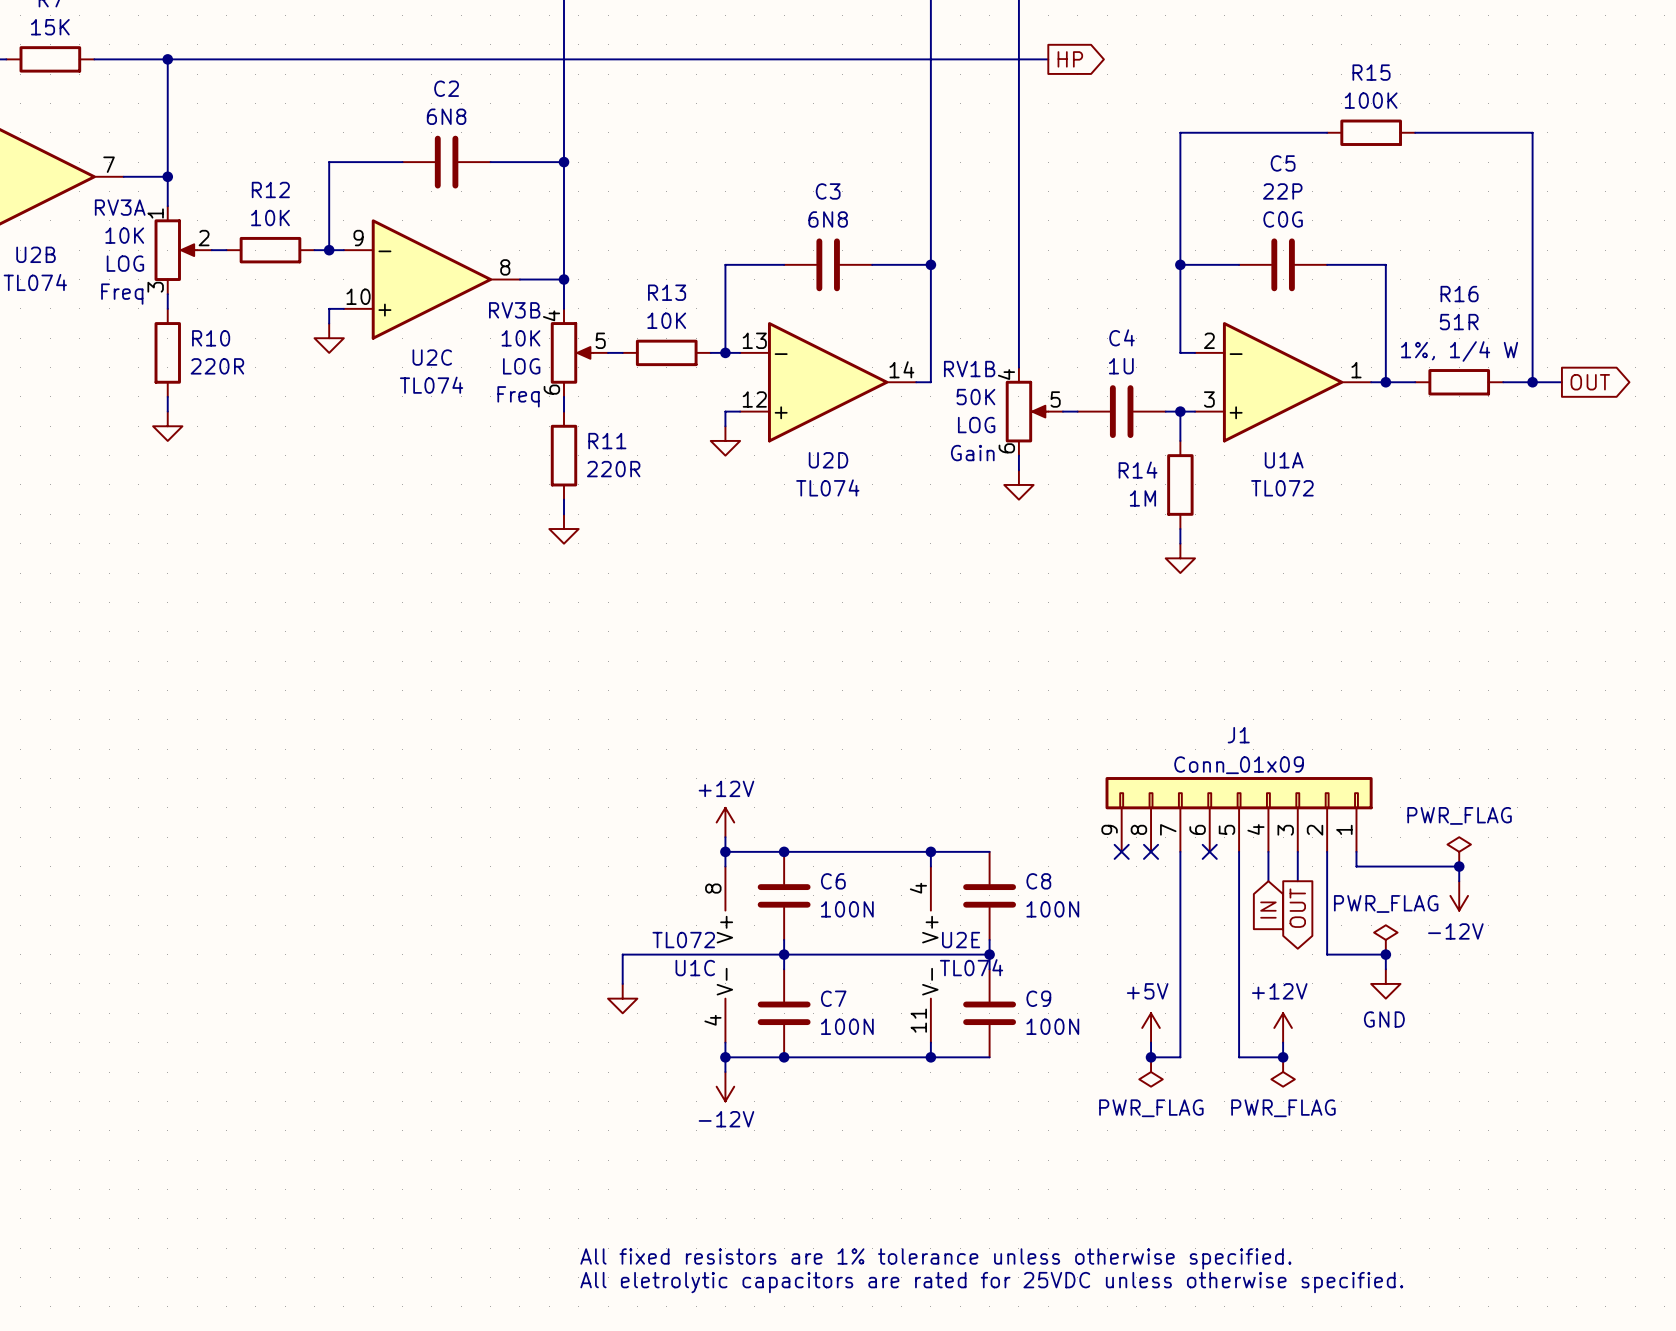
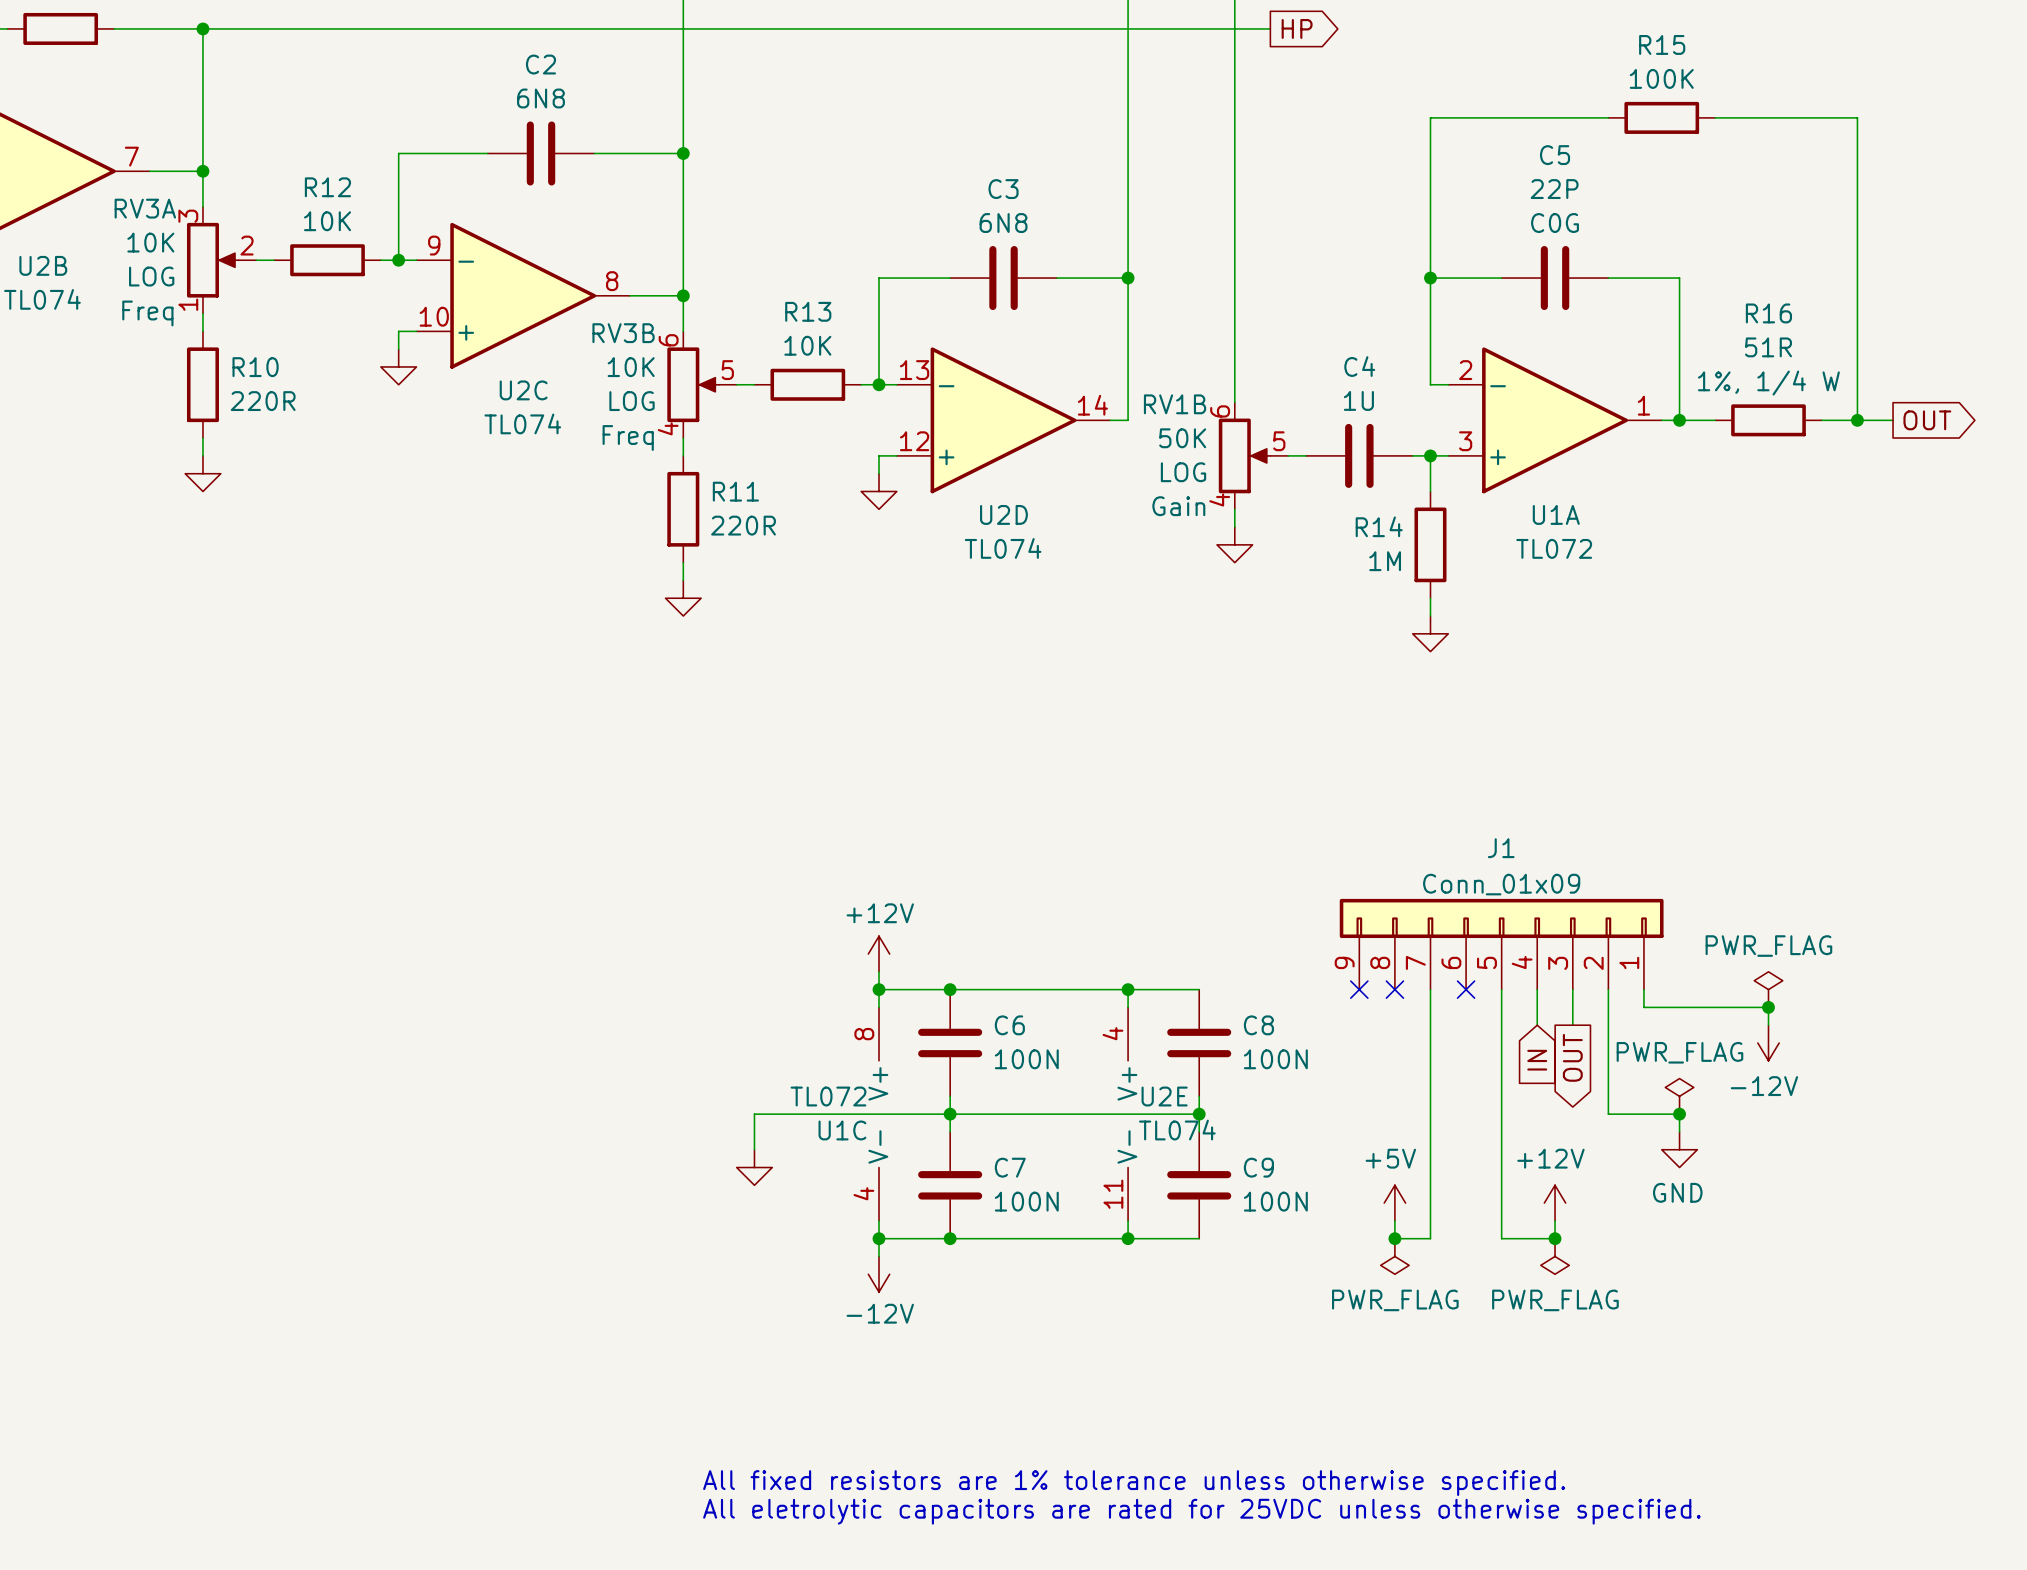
RV3A flip: as is (175, 250) -> up-down (212, 260)
RV3B flip: as is (572, 352) -> up-down (693, 384)
RV1B flip: as is (1027, 411) -> up-down (1244, 455)

